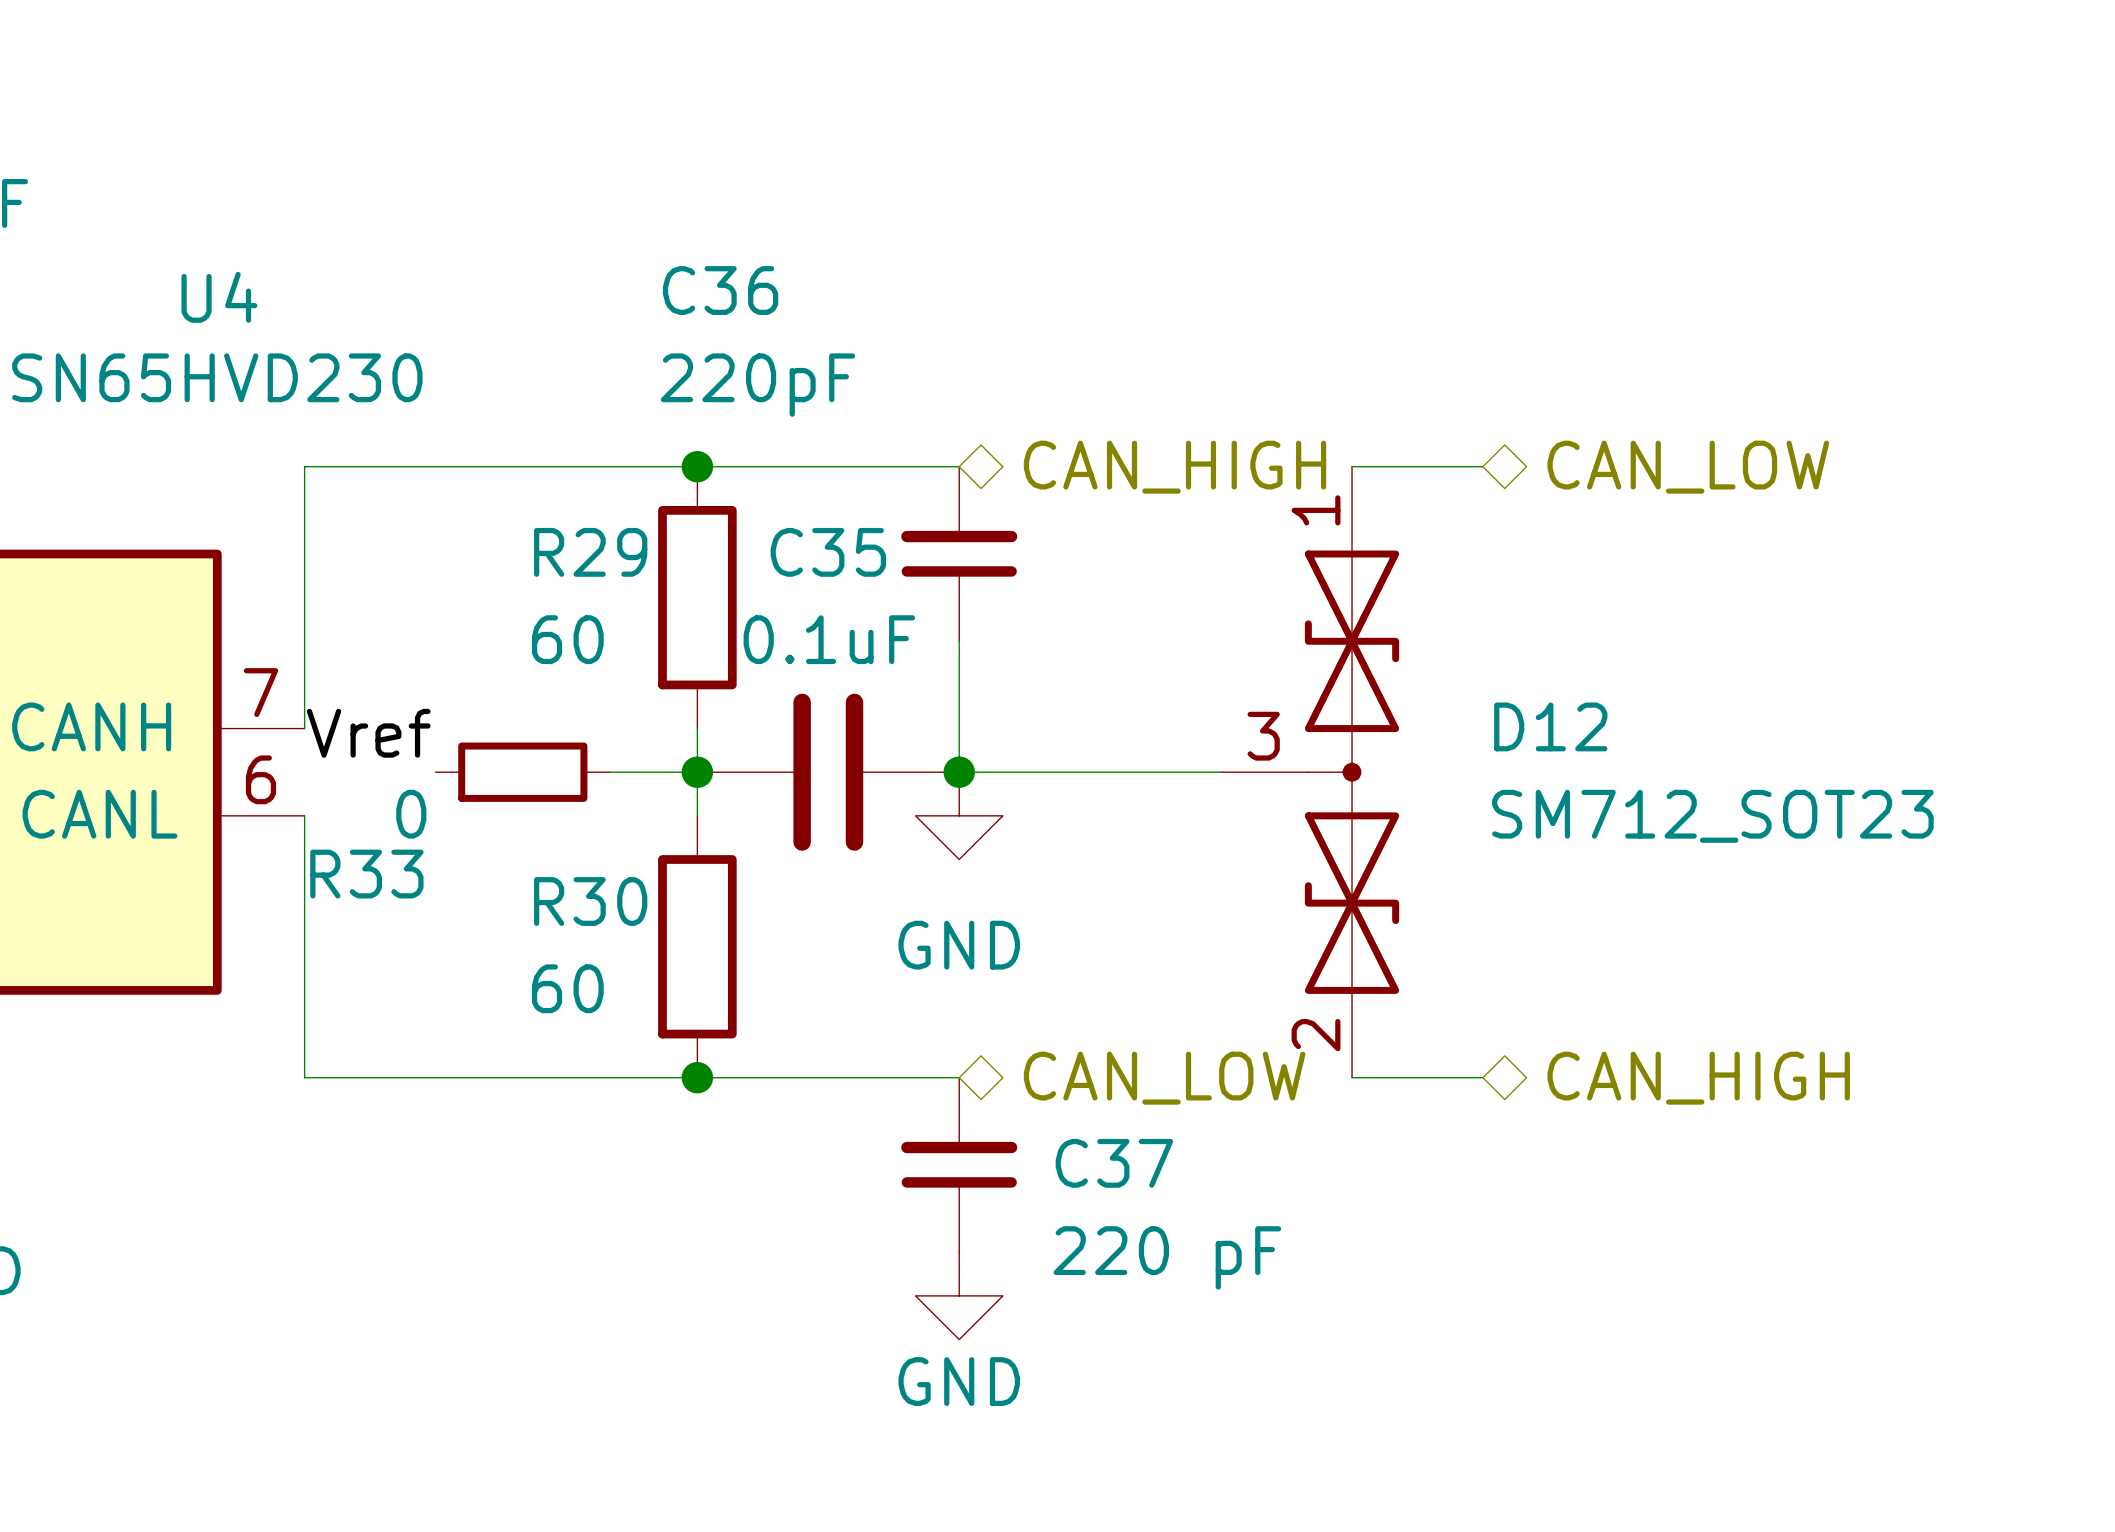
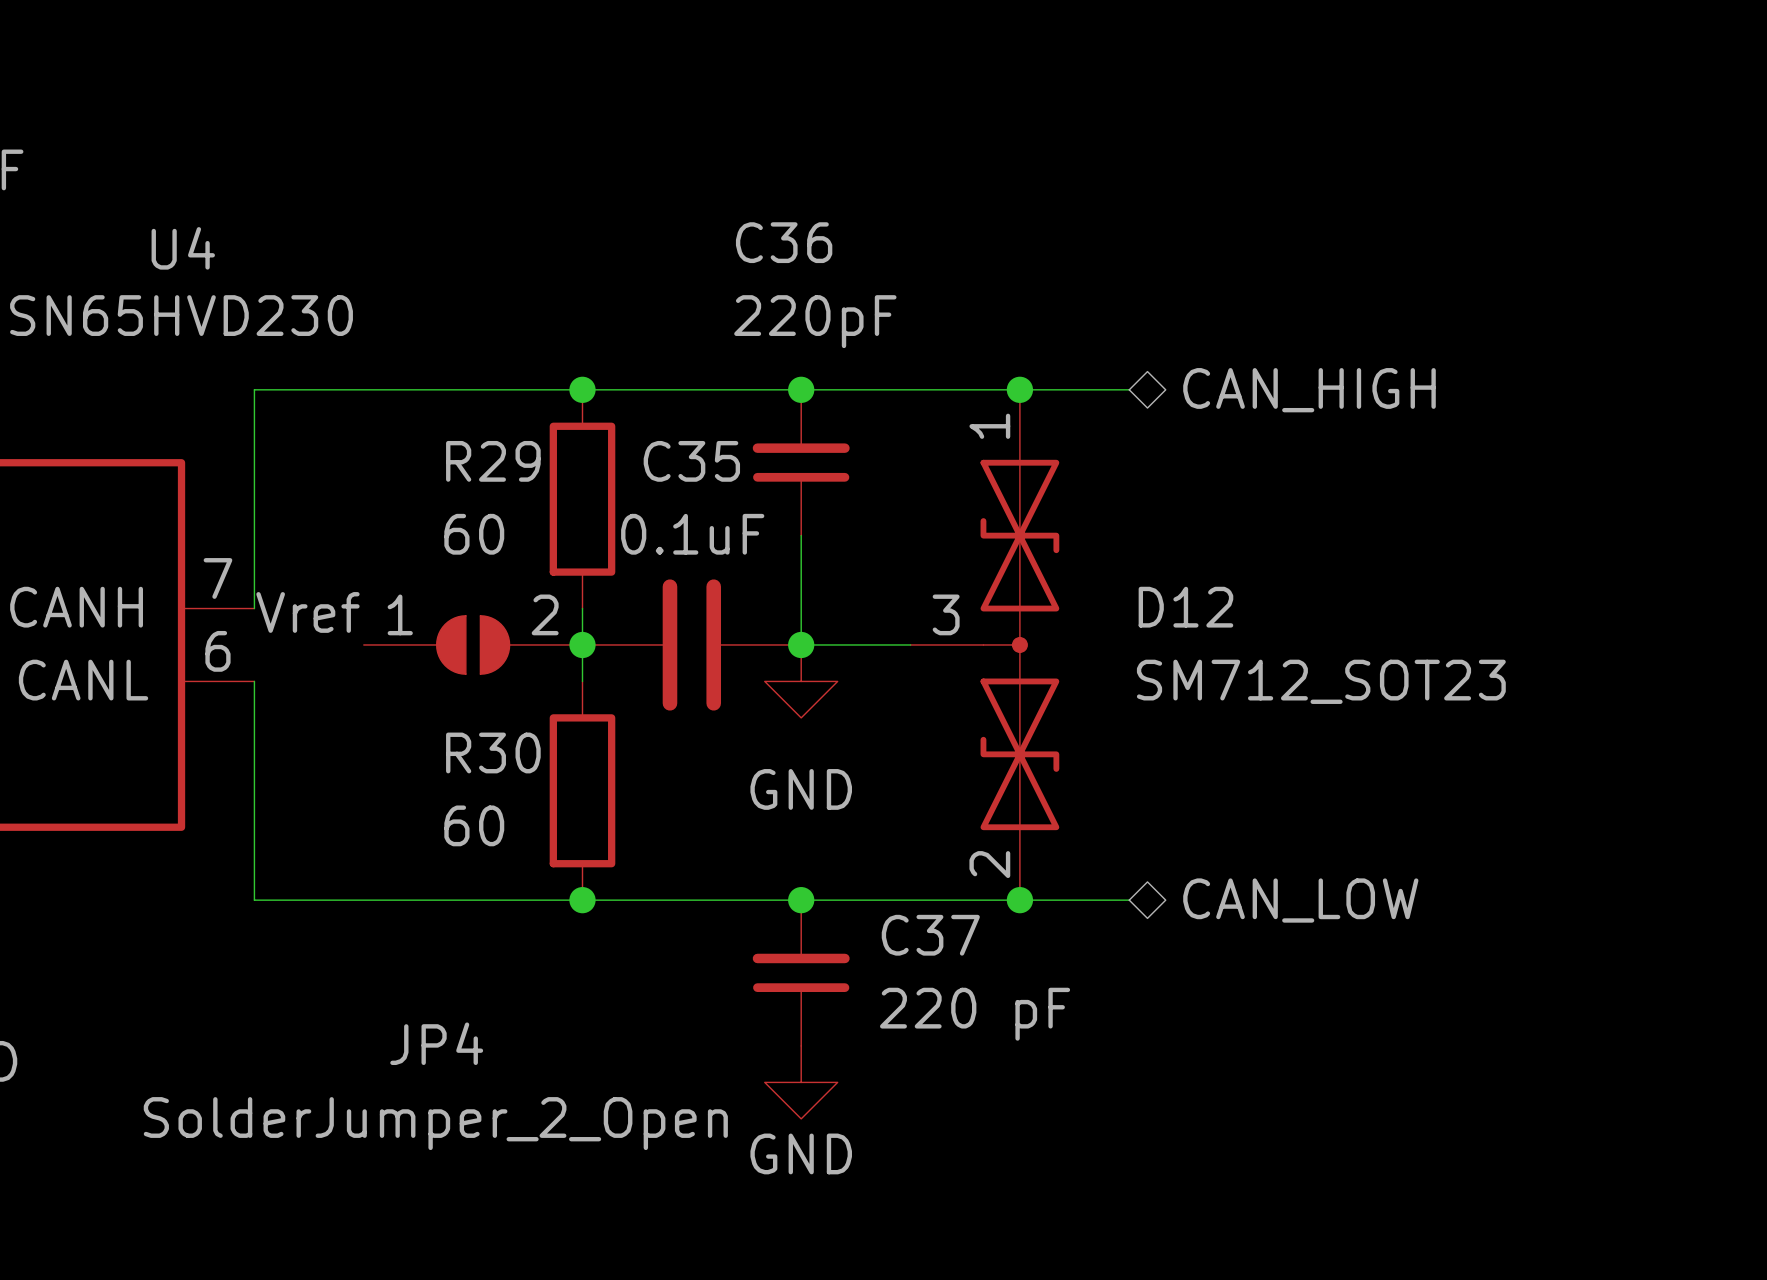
C36 name position: C36 (720, 290) -> C36 (784, 242)
C36 value position: 220pF (757, 385) -> 220pF (815, 321)
junction: none -> (801, 389)
junction: none -> (1019, 389)
wire: (1352, 466) (1482, 466) -> (1129, 389) (801, 389)
hierarchical label: CAN_HIGH (1175, 467) -> none
hierarchical label: none -> CAN_HIGH (1309, 390)
hierarchical label: CAN_LOW (1688, 467) -> none
R33: 0 (522, 772) -> none
JP4: none -> SolderJumper_2_Open (473, 644)
D12 position: (1310, 772) -> (984, 644)
junction: none -> (801, 900)
junction: none -> (1019, 900)
wire: (1352, 1077) (1482, 1077) -> (1129, 900) (801, 900)
hierarchical label: CAN_LOW (1164, 1078) -> none
hierarchical label: none -> CAN_LOW (1300, 900)
hierarchical label: CAN_HIGH (1698, 1078) -> none
C37 name position: C37 (1114, 1163) -> C37 (930, 935)
C37 value position: 220 pF (1167, 1257) -> 220 pF (975, 1014)

